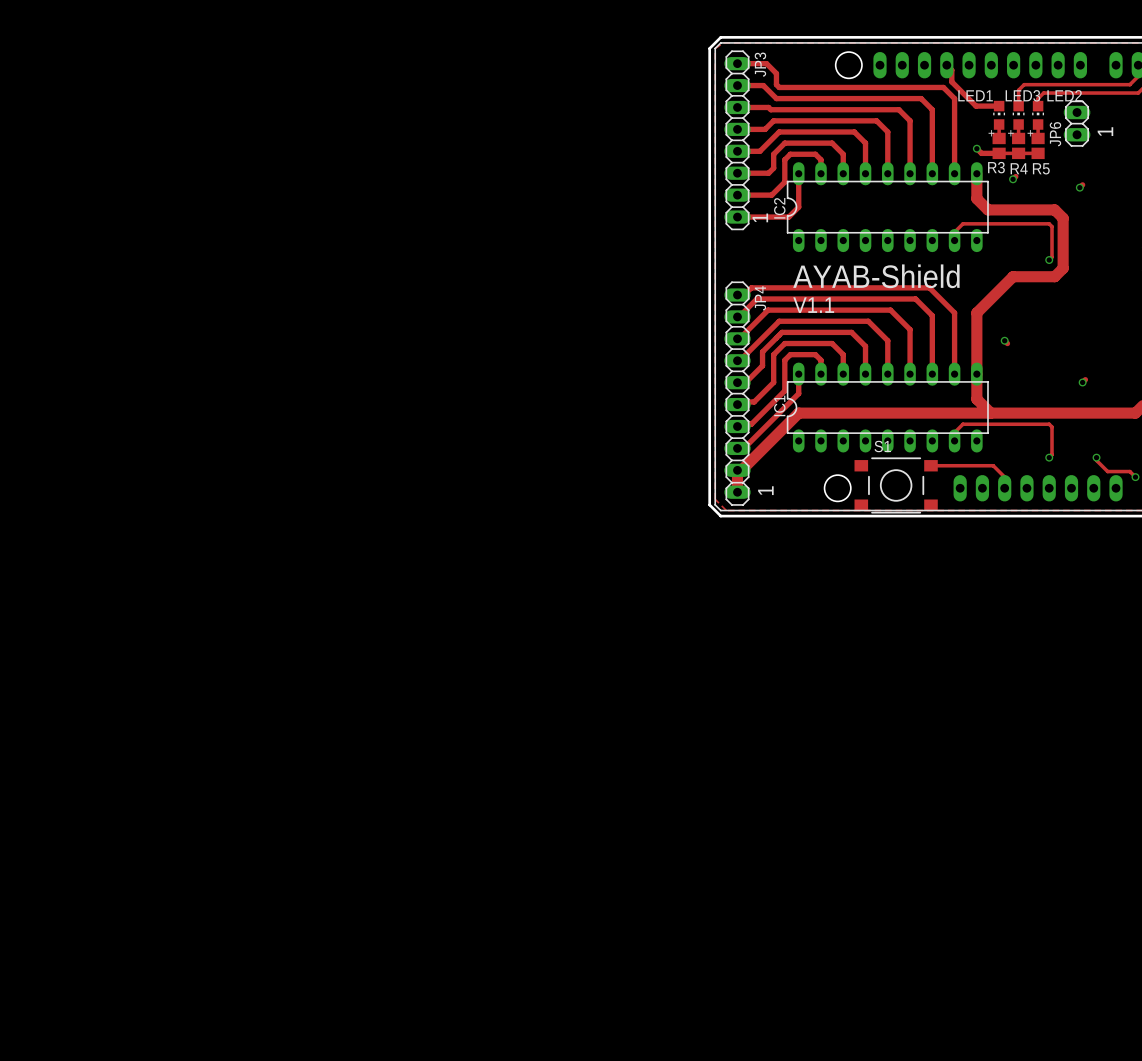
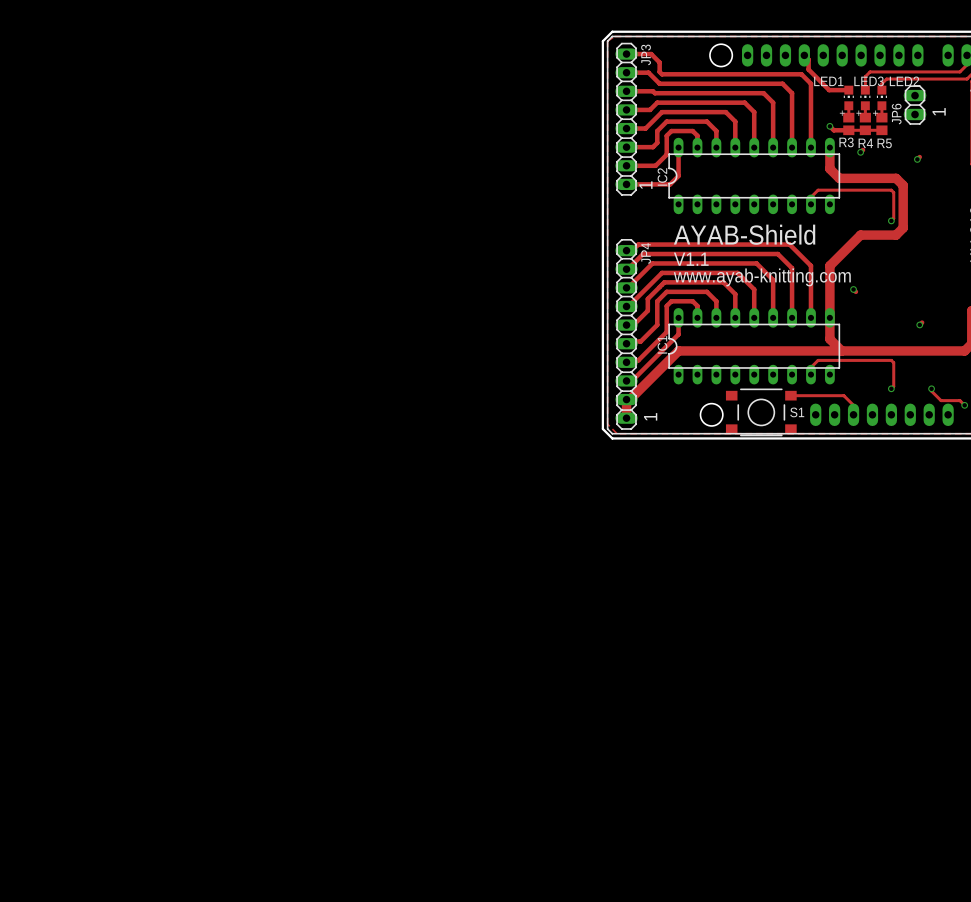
text: none -> www.ayab-knitting.com (762, 277)
S1 name position: S1 (882, 446) -> S1 (797, 412)

